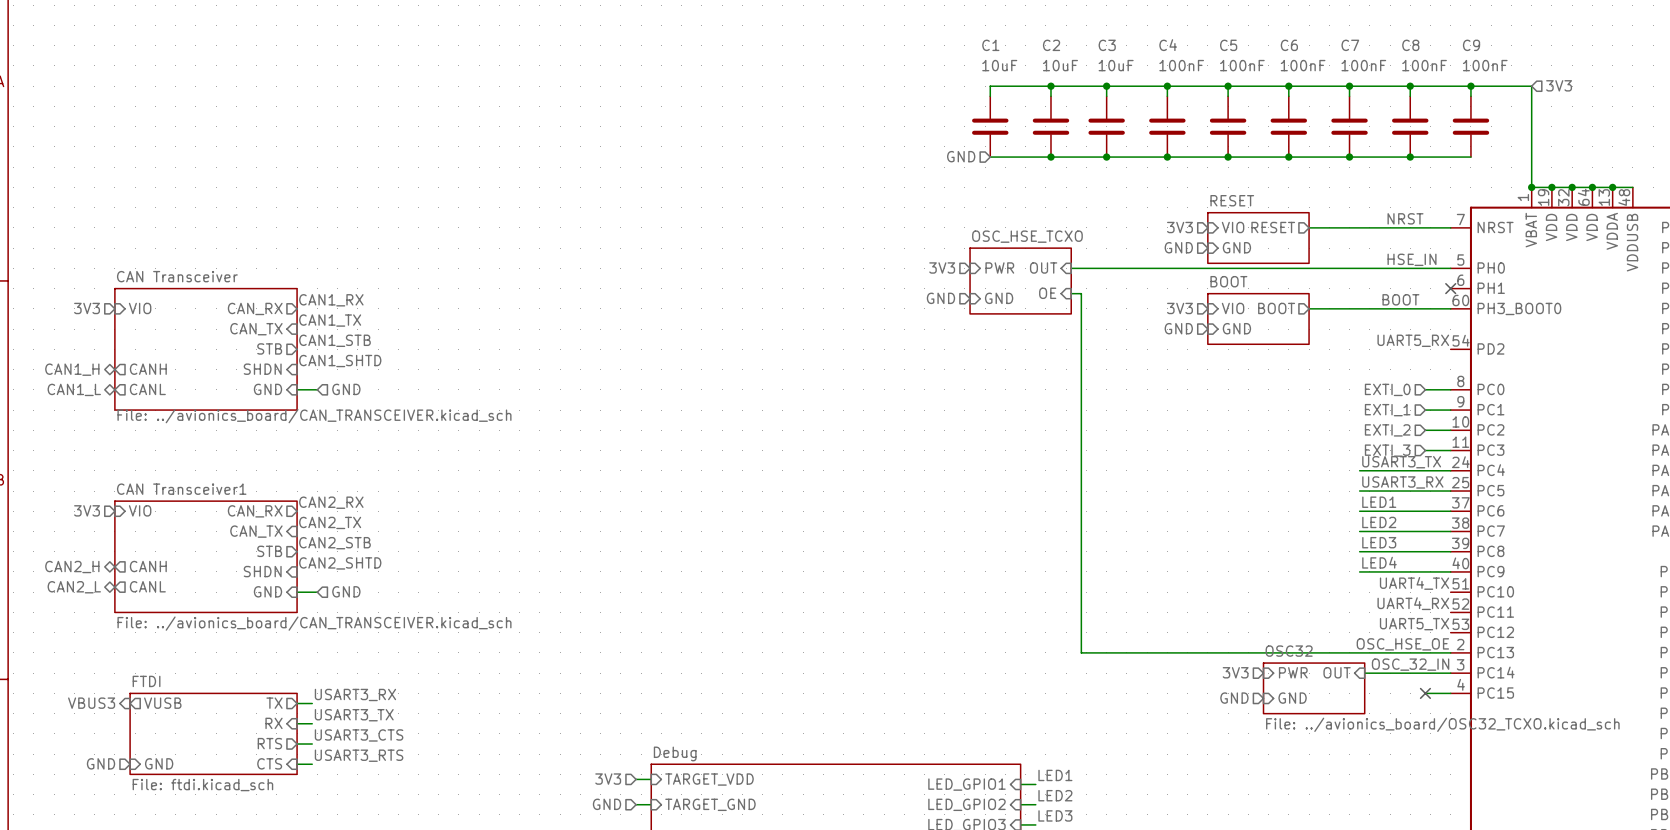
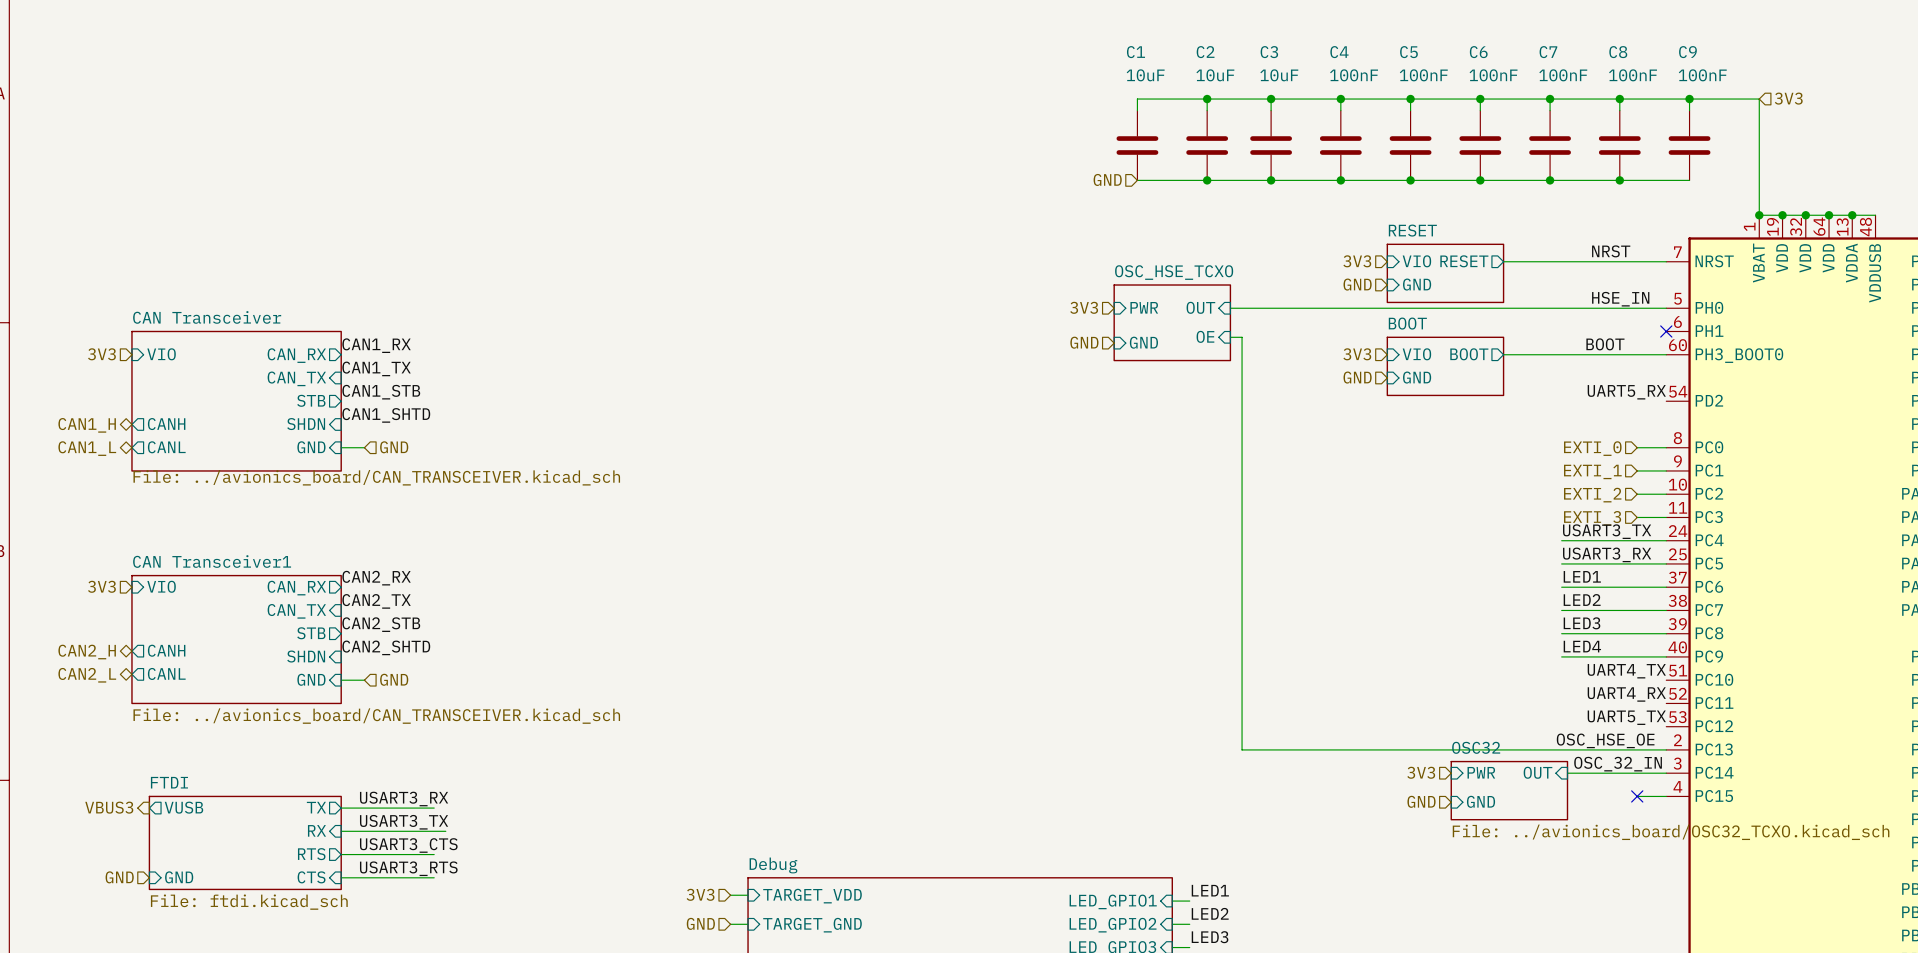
wire: none -> (358, 808) (434, 808)
wire: none -> (358, 831) (445, 831)
wire: none -> (358, 854) (434, 854)
wire: none -> (358, 877) (434, 877)

